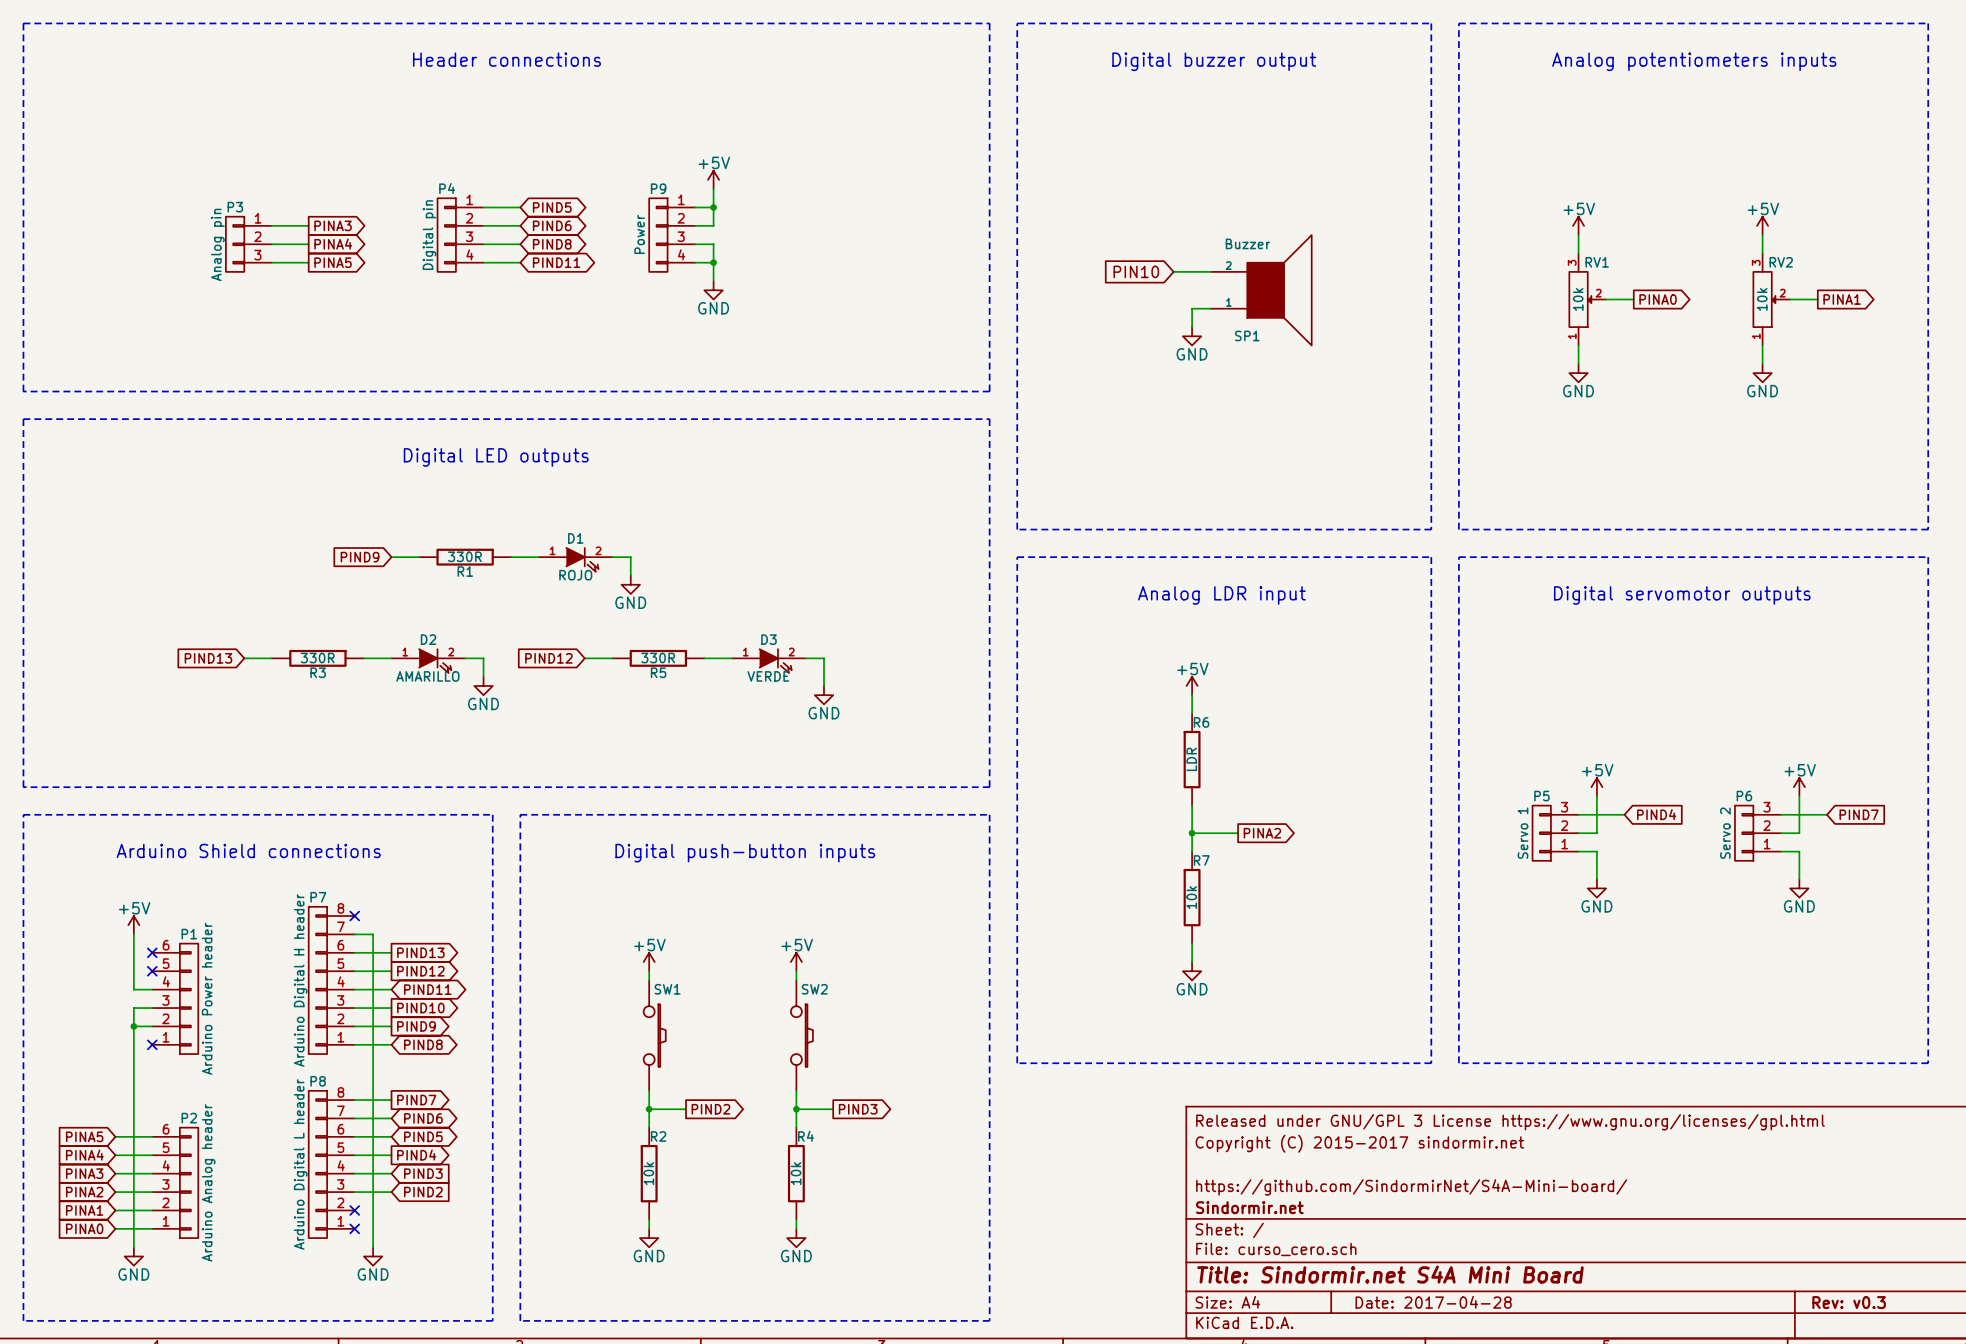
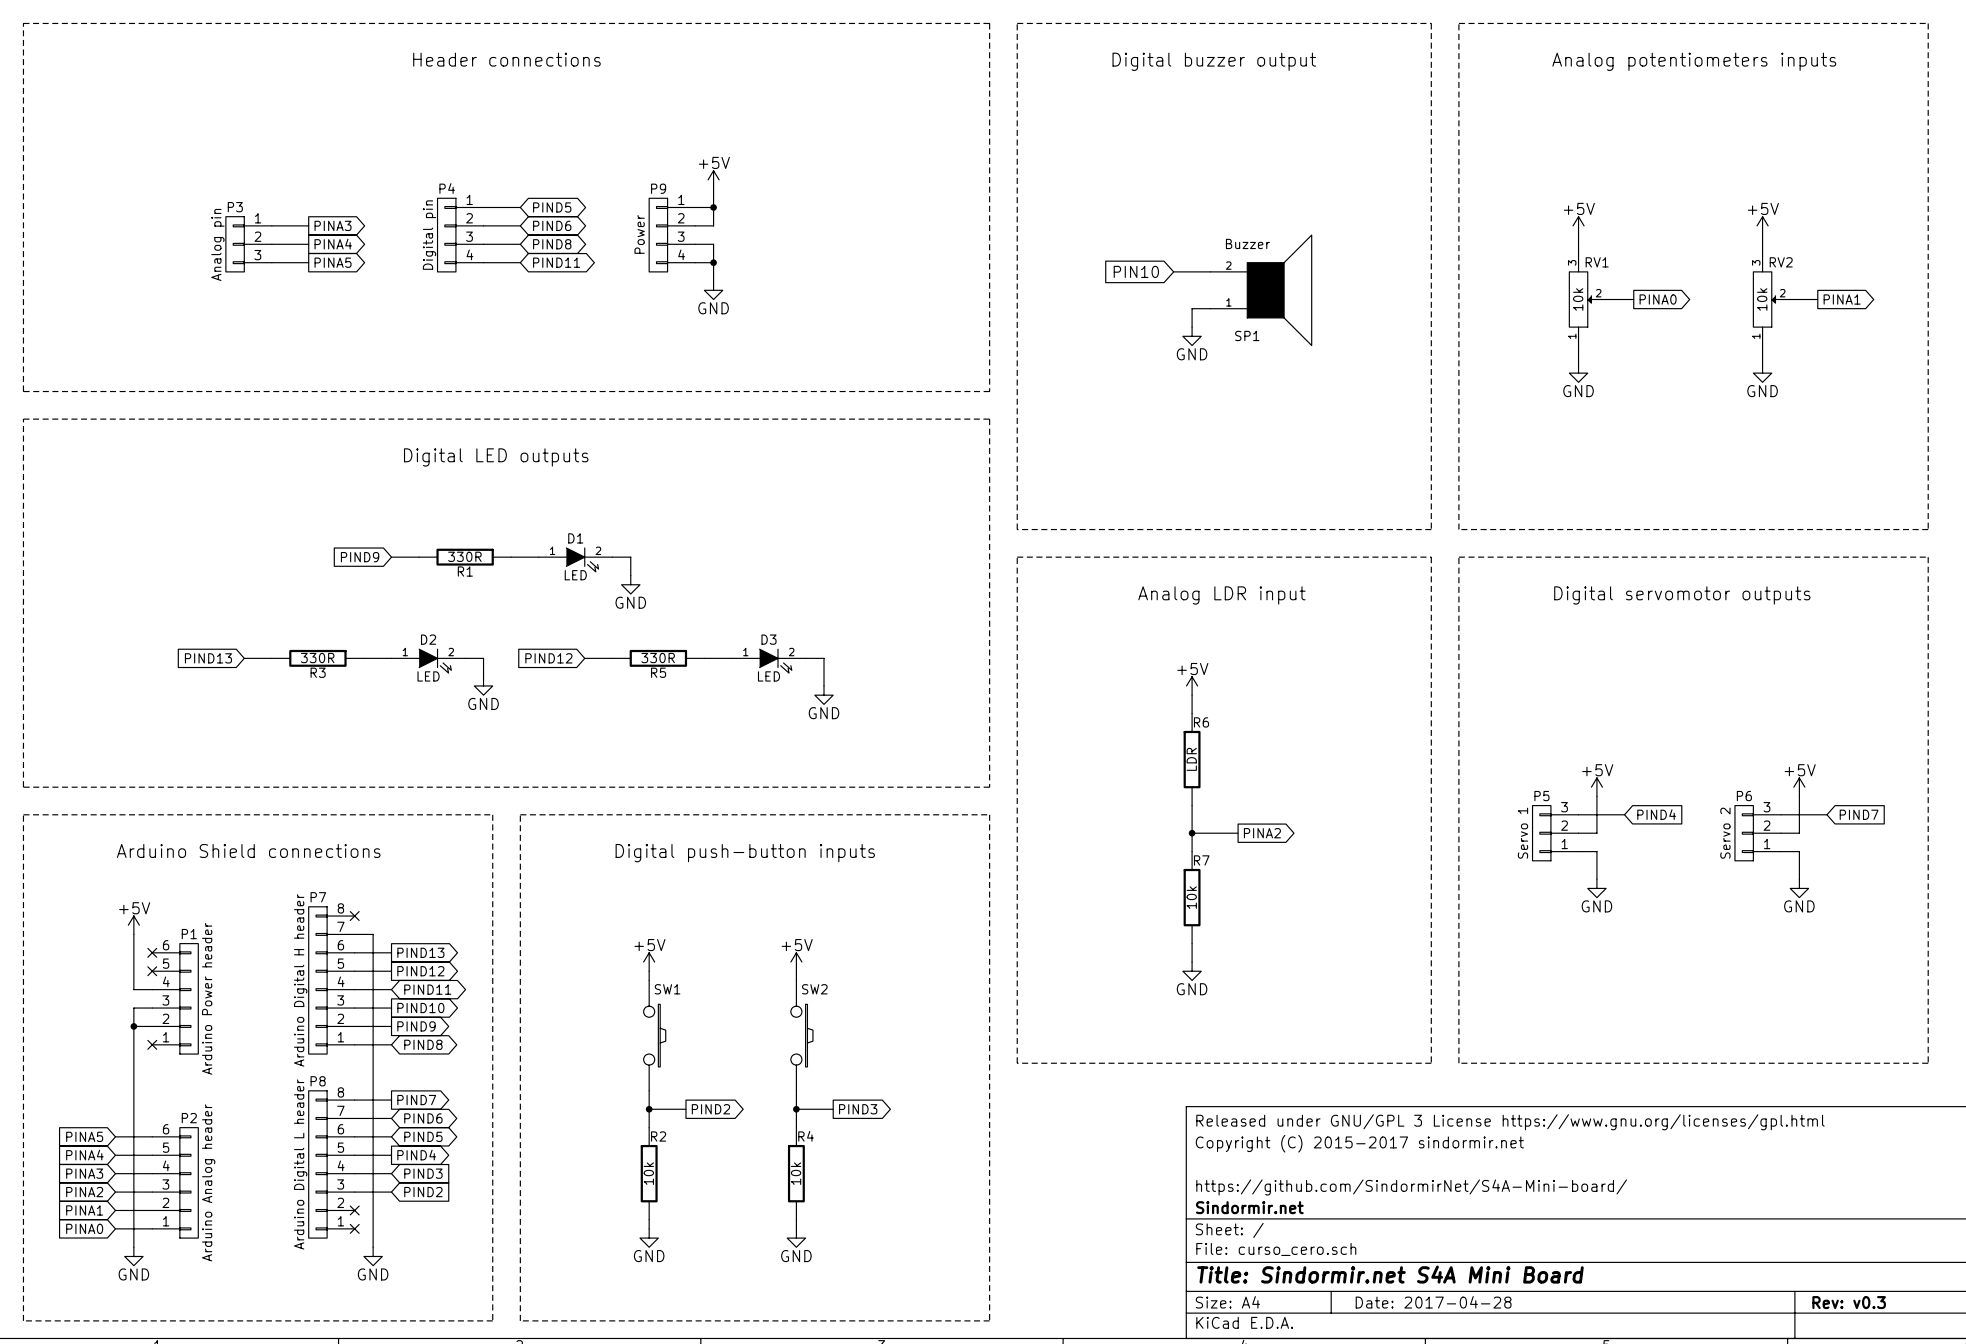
D1 value: ROJO (575, 575) -> LED (575, 575)
D2 value: AMARILLO (427, 676) -> LED (428, 676)
D3 value: VERDE (768, 676) -> LED (769, 676)

